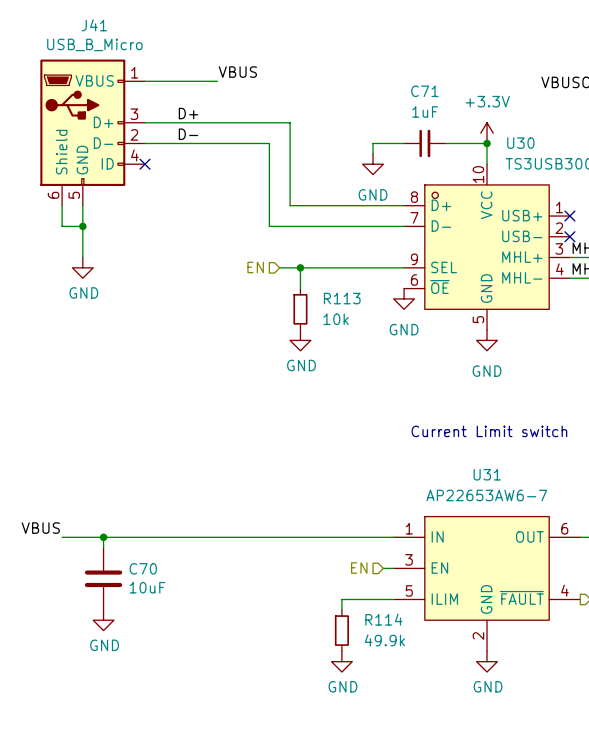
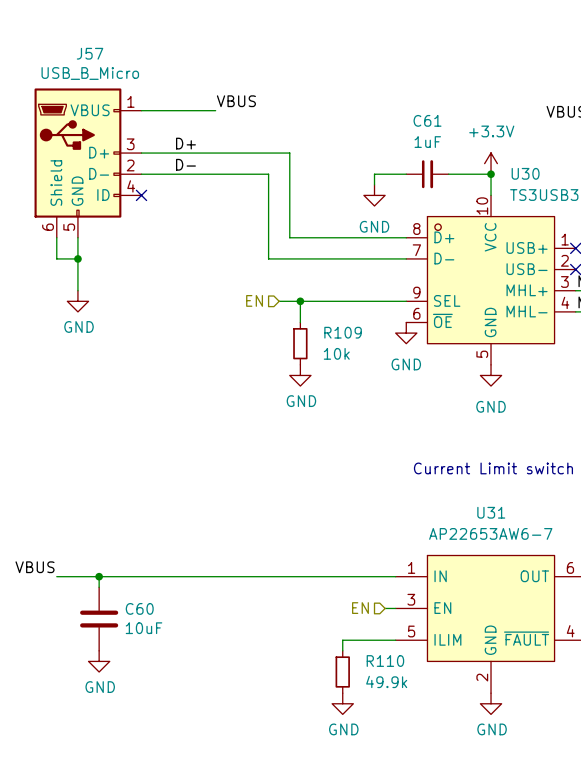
J41 name: J41 (94, 25) -> J57 (90, 53)
C71 name: C71 (424, 91) -> C61 (427, 120)
R113 name: R113 (342, 298) -> R109 (343, 332)
C70 name: C70 (143, 568) -> C60 (139, 608)
R114 name: R114 (383, 619) -> R110 (385, 661)

